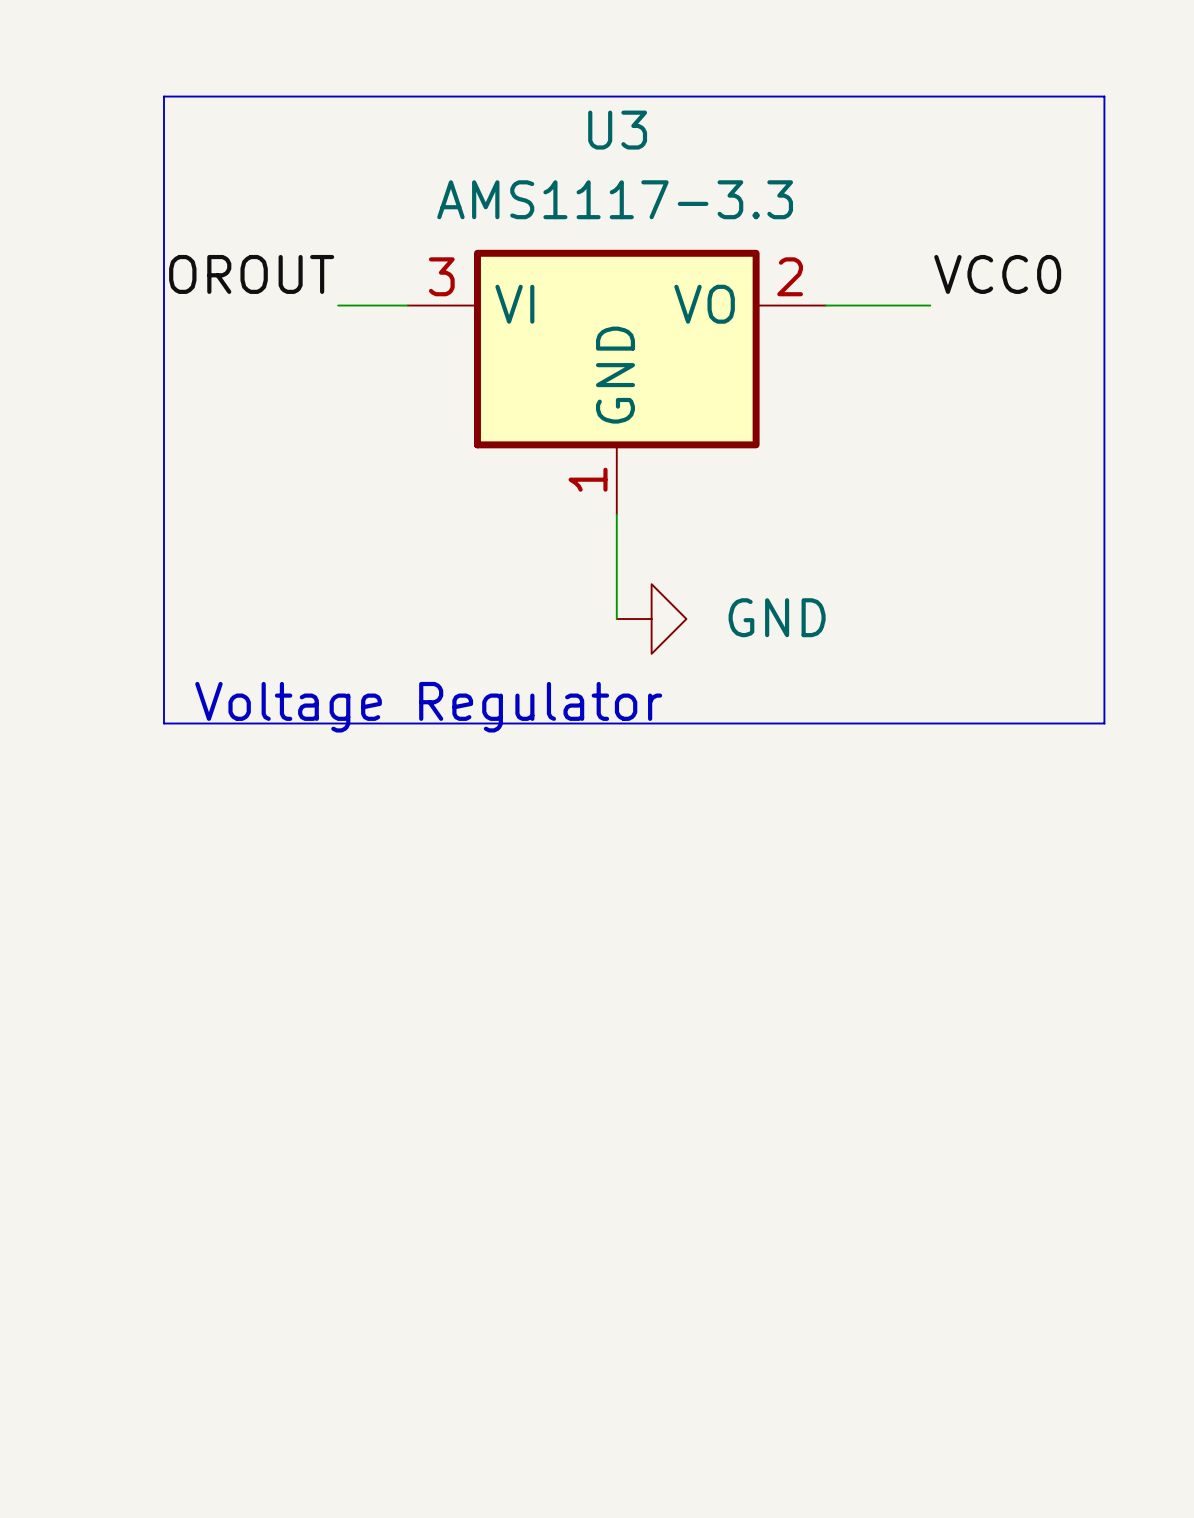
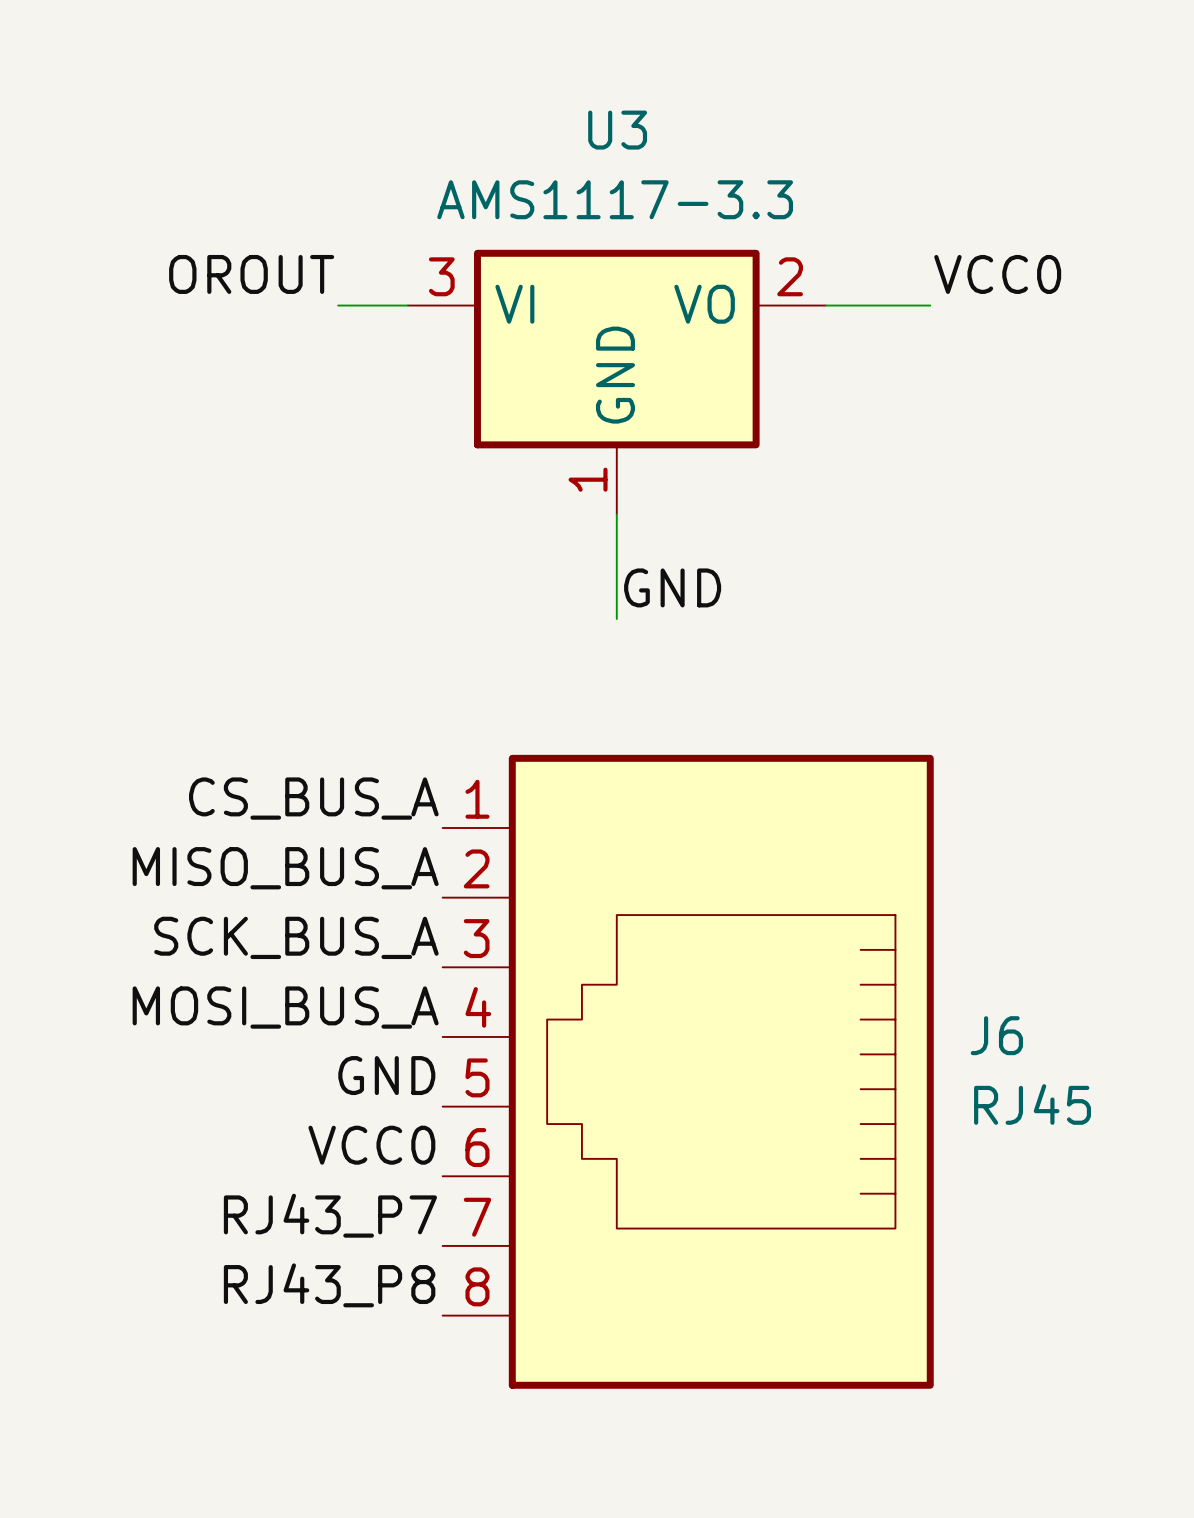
line: (164, 96) (1104, 96) (1104, 723) (164, 723) (164, 96) -> none
label: none -> GND (672, 587)
power symbol: GND (651, 619) -> none
text: Voltage Regulator (428, 707) -> none
label: none -> CS_BUS_A (313, 798)
label: none -> MISO_BUS_A (285, 868)
label: none -> SCK_BUS_A (296, 937)
label: none -> MOSI_BUS_A (285, 1007)
J6: none -> RJ45 (688, 1071)
label: none -> GND (386, 1075)
label: none -> VCC0 (371, 1145)
label: none -> RJ43_P7 (330, 1215)
label: none -> RJ43_P8 (329, 1285)

